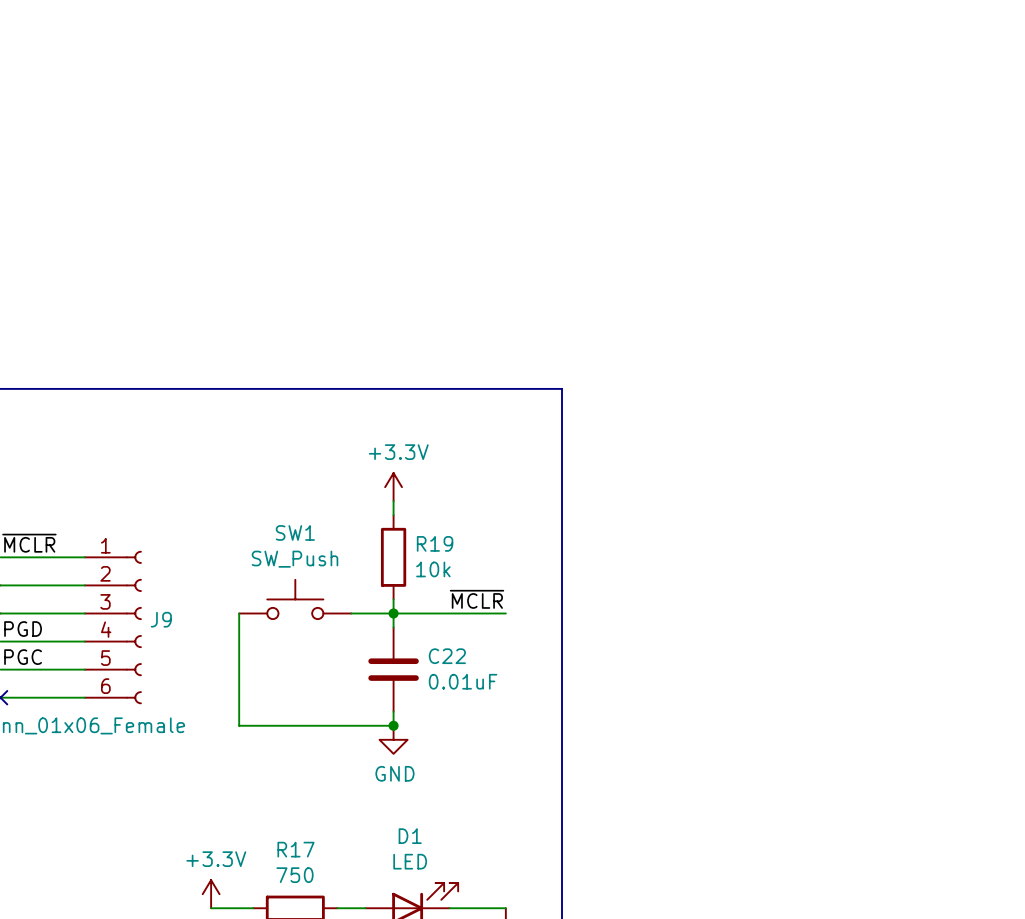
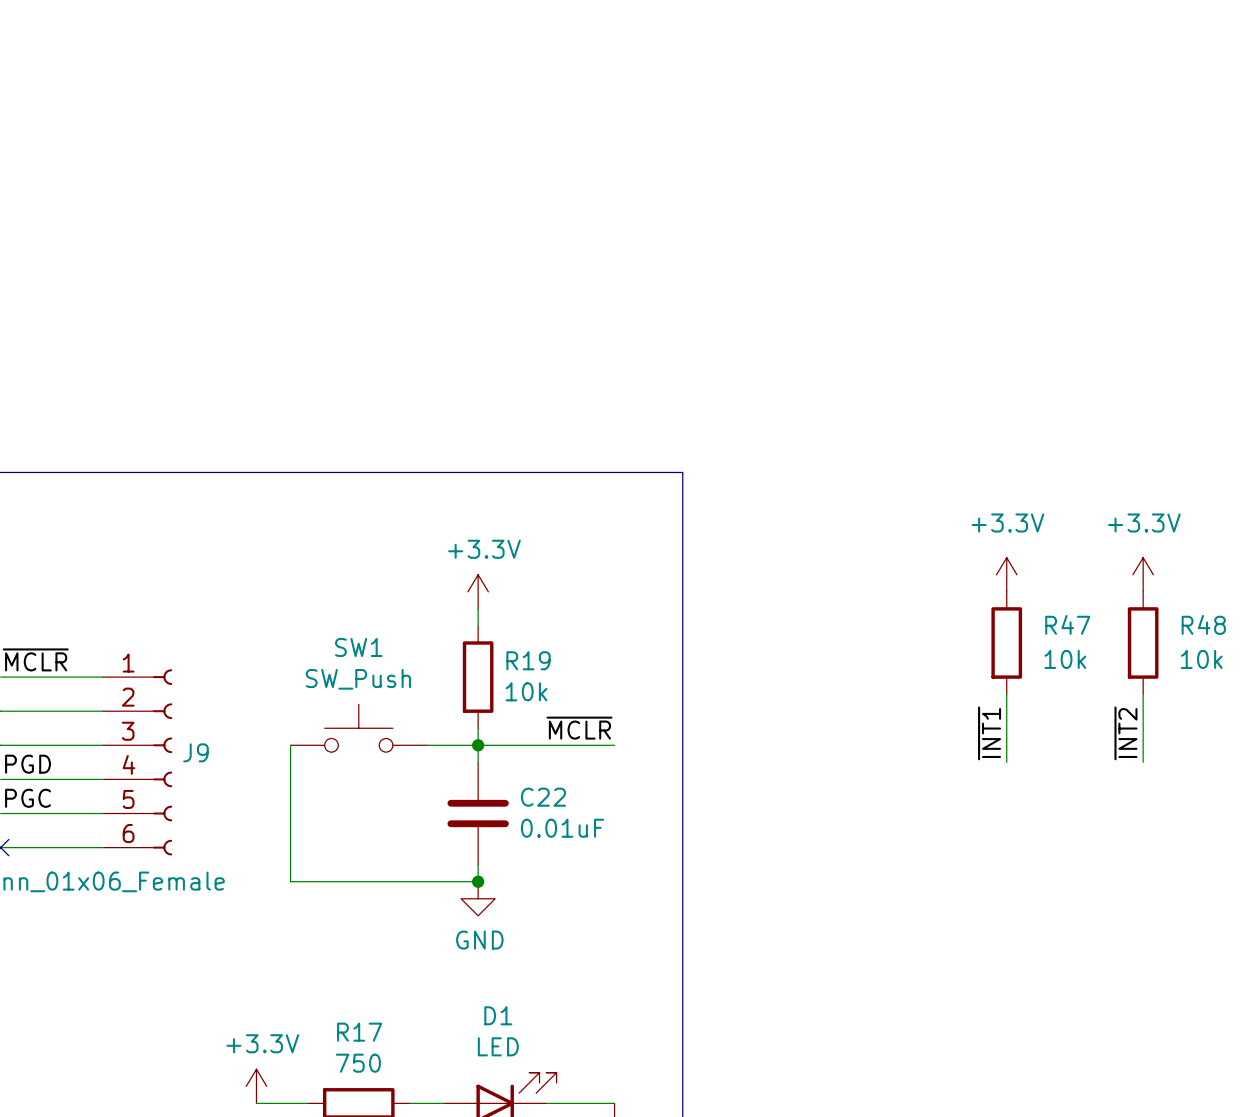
power symbol: none -> +3.3V (1006, 574)
power symbol: none -> +3.3V (1143, 574)
R47: none -> 10k (1006, 642)
R48: none -> 10k (1143, 642)
wire: none -> (1006, 694) (1006, 762)
wire: none -> (1143, 694) (1143, 762)
label: none -> ~{INT1} (989, 733)
label: none -> ~{INT2} (1125, 733)

